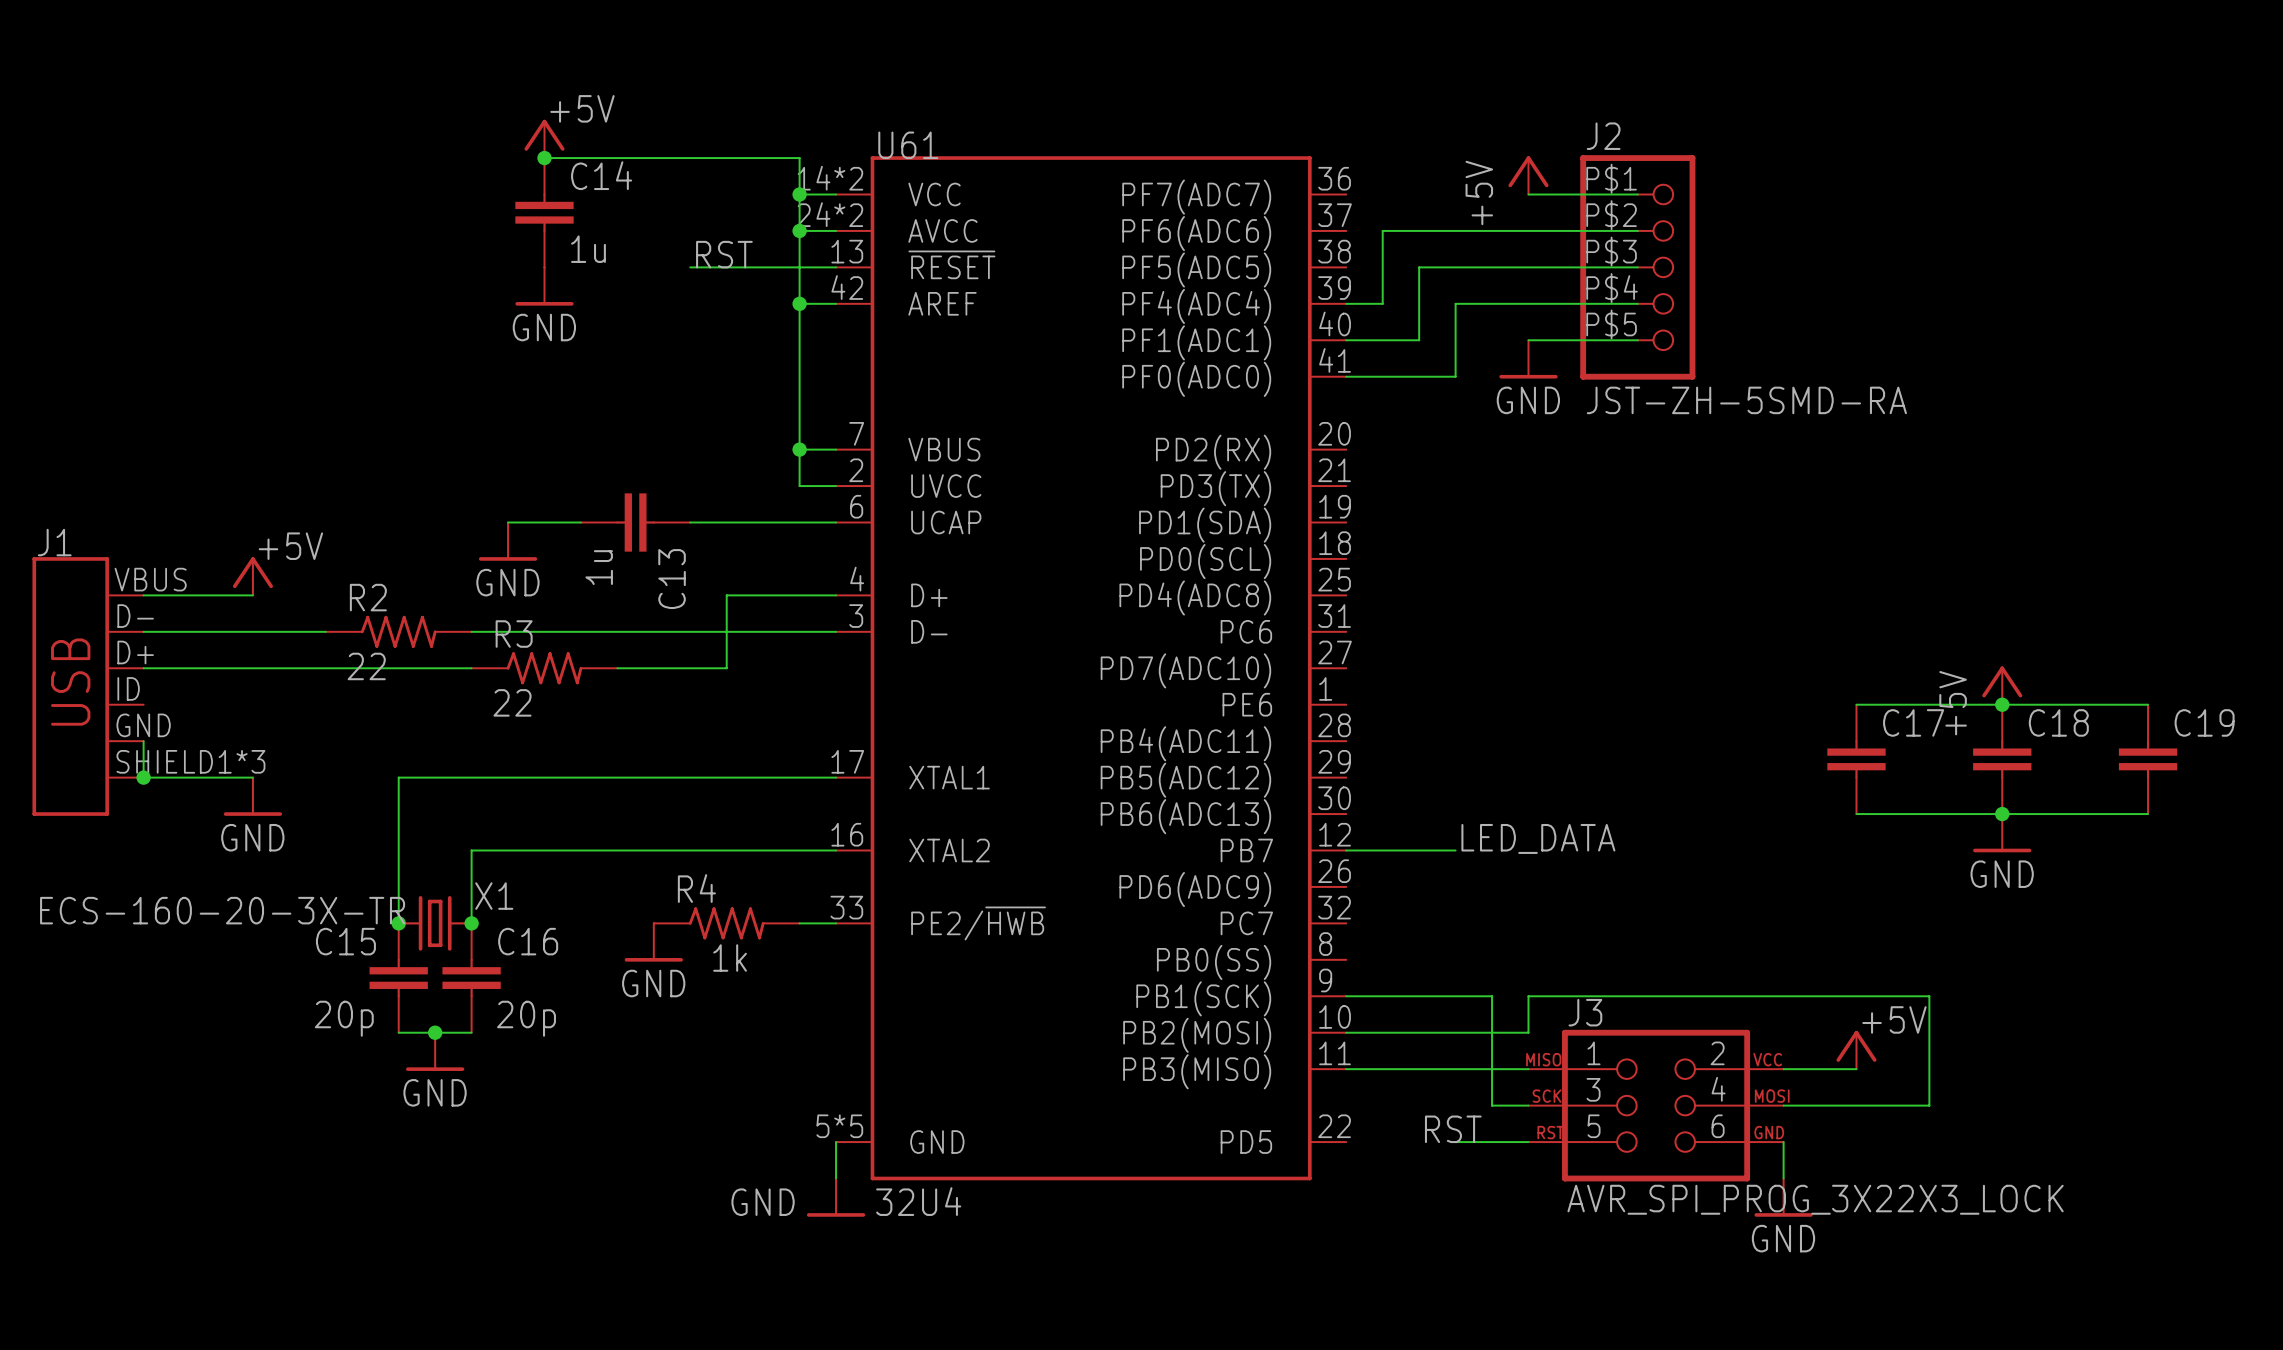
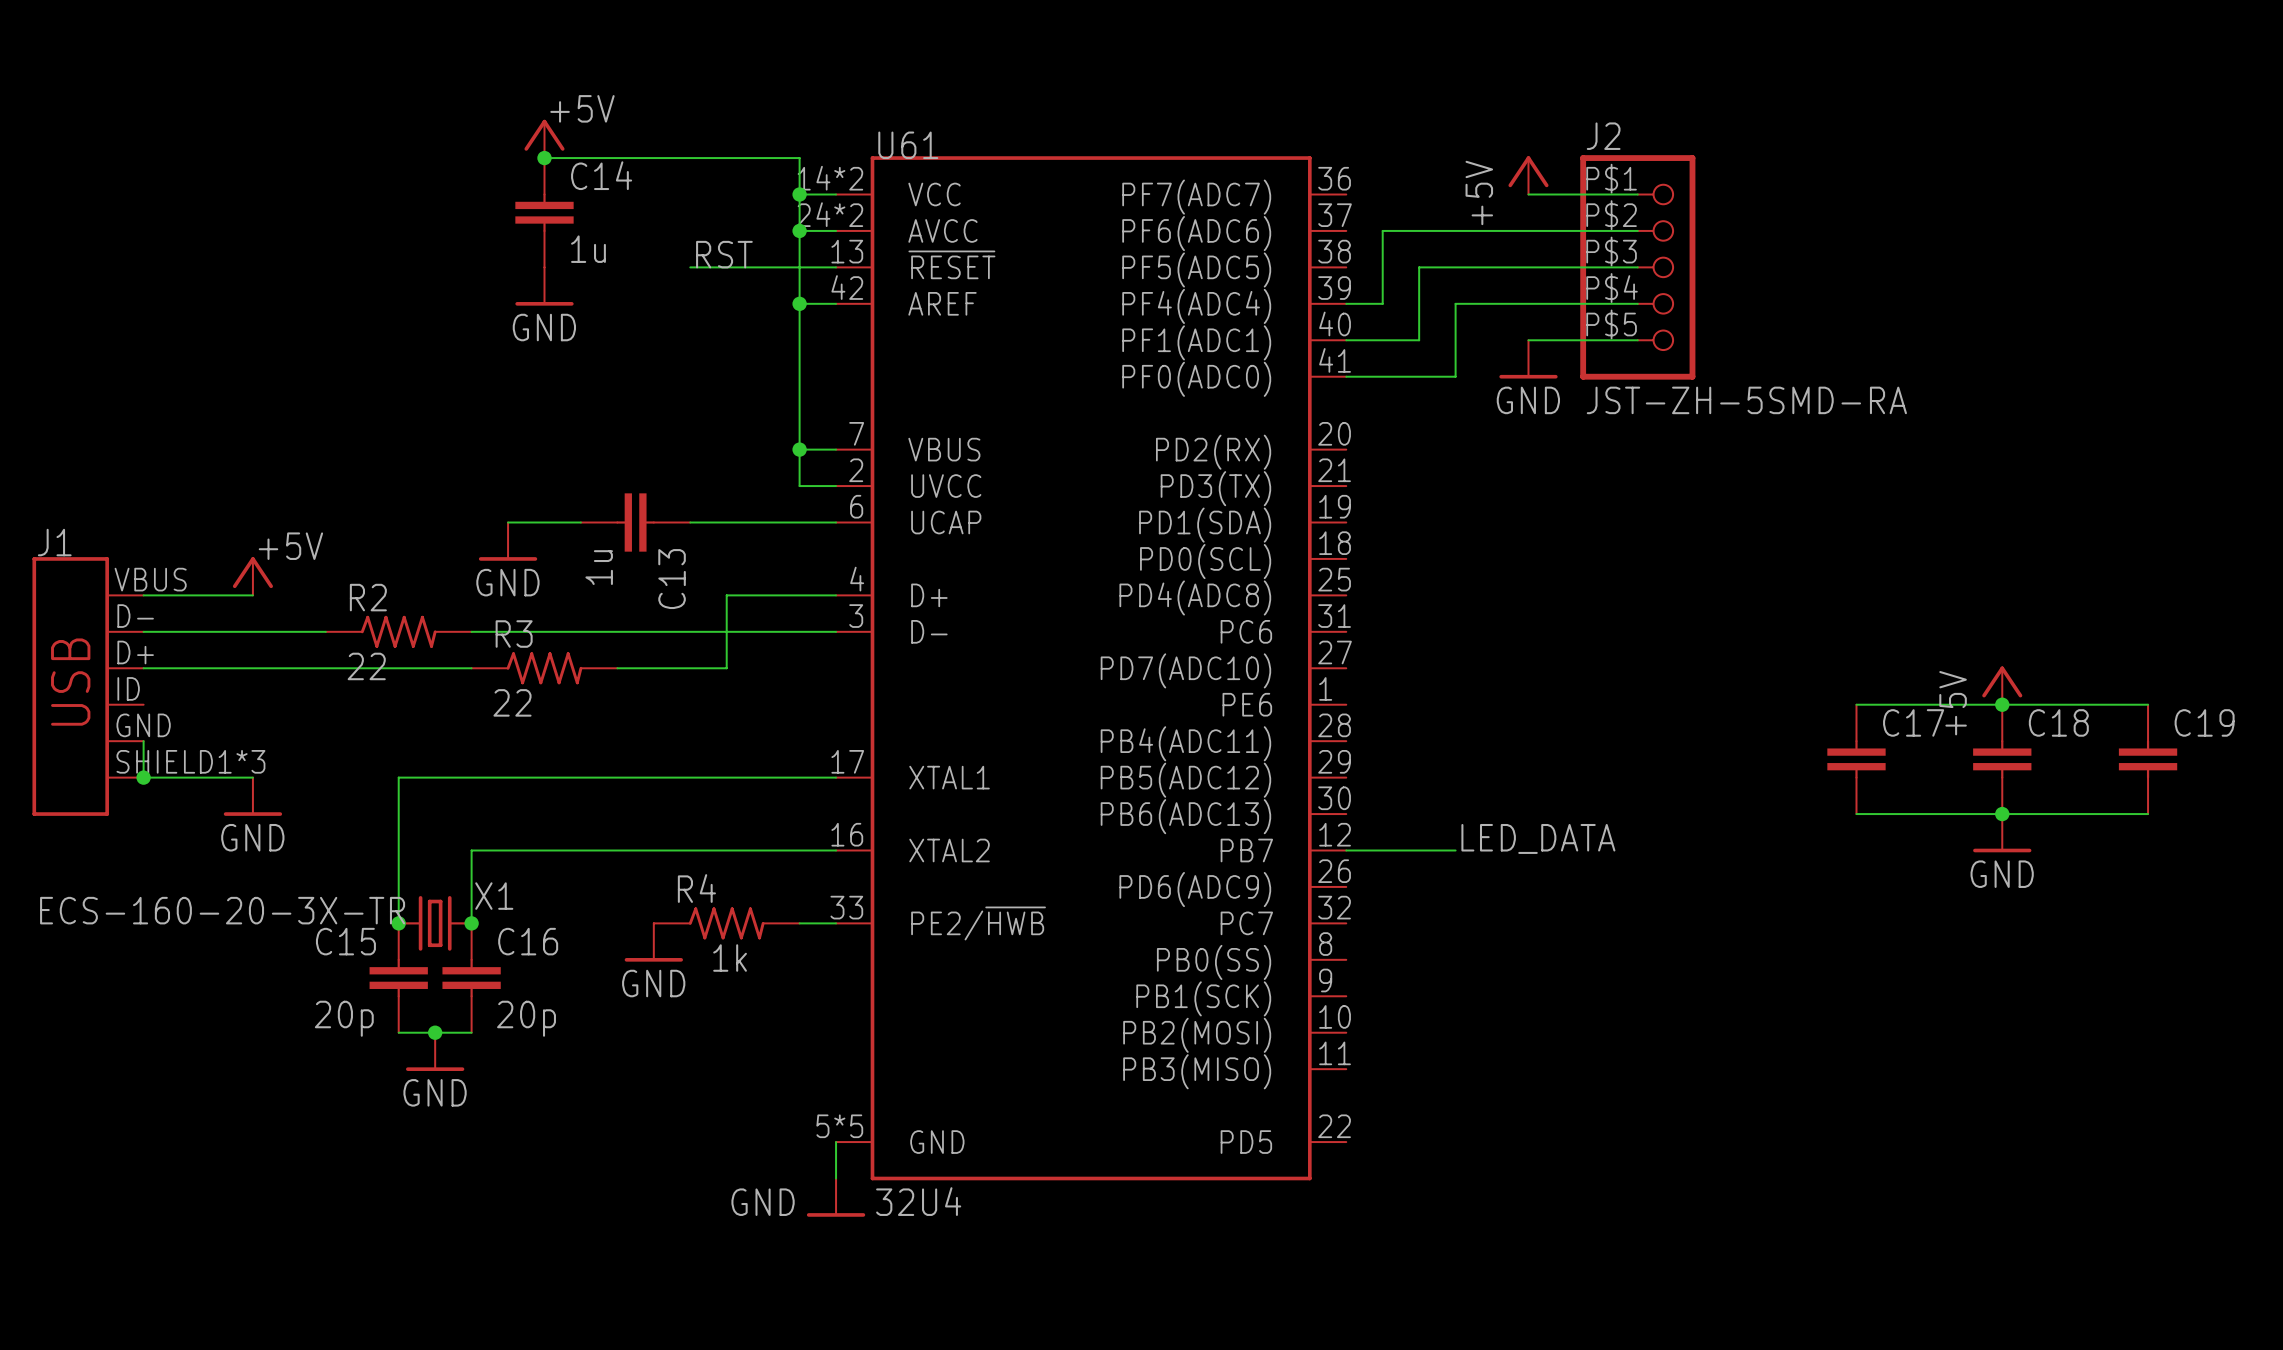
wire: (1346, 996) (1492, 996) (1492, 1105) (1528, 1105) -> none
wire: (1346, 1032) (1528, 1032) (1528, 996) (1929, 996) (1929, 1105) (1783, 1105) -> none
power symbol: +5V (1856, 1050) -> none
wire: (1346, 1069) (1528, 1069) -> none
wire: (1783, 1069) (1856, 1069) -> none
J3: AVR_SPI_PROG_3X22X3_LOCK (1656, 1105) -> none
label: RST (1453, 1129) -> none
wire: (1455, 1142) (1528, 1142) -> none
wire: (1783, 1142) (1783, 1178) -> none
power symbol: GND (1783, 1197) -> none

